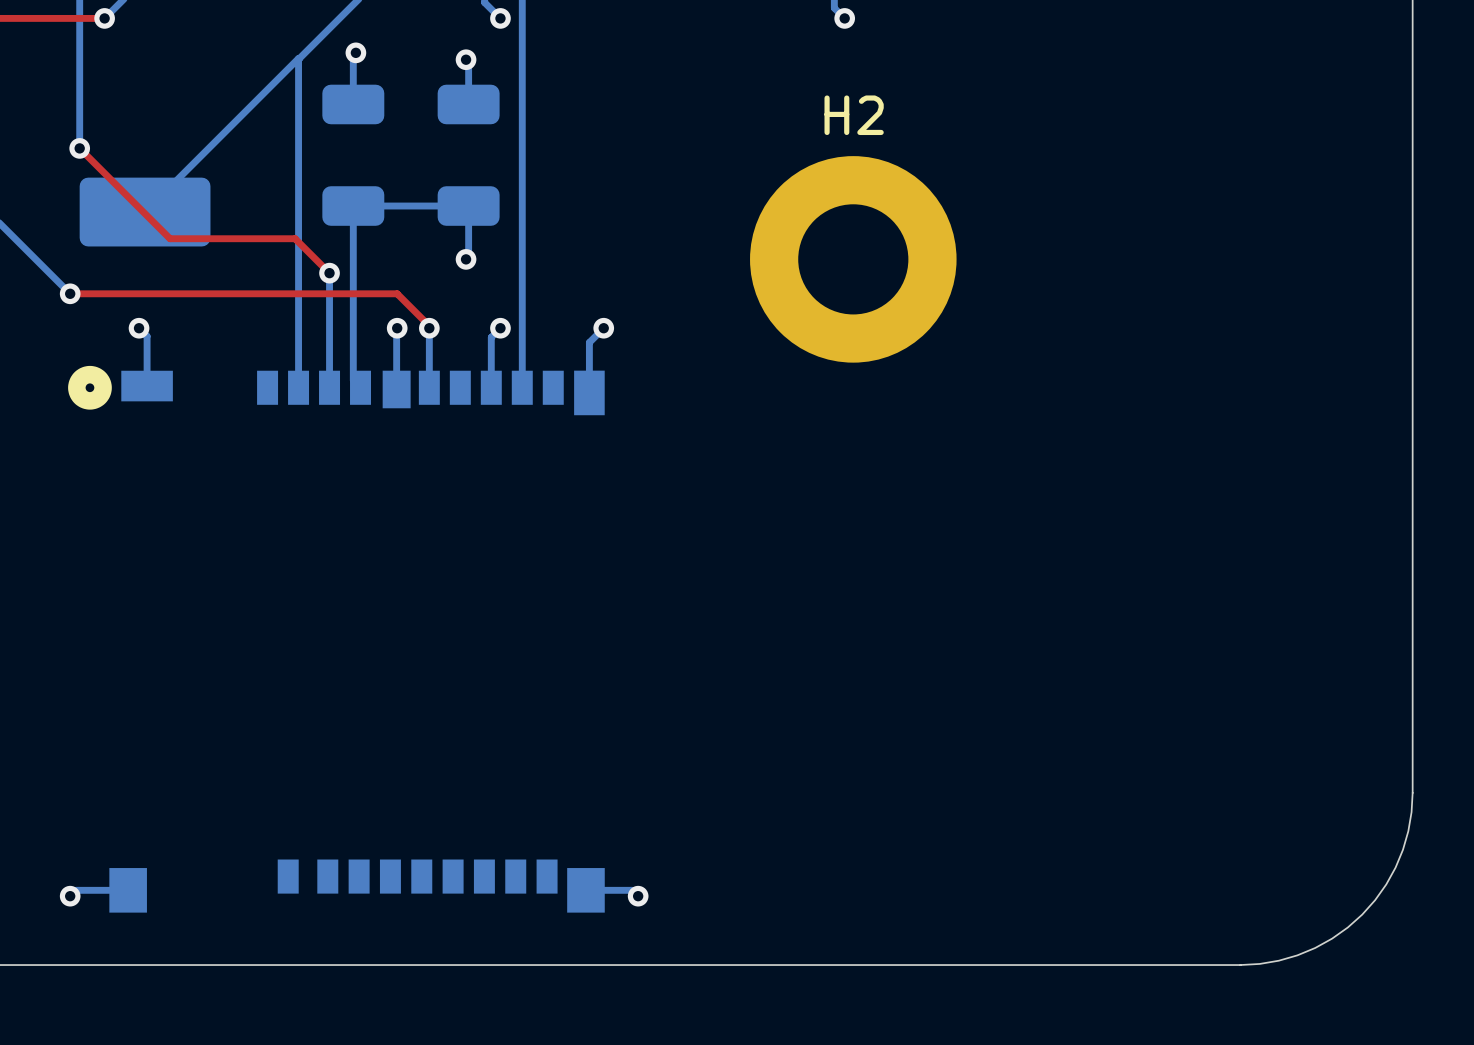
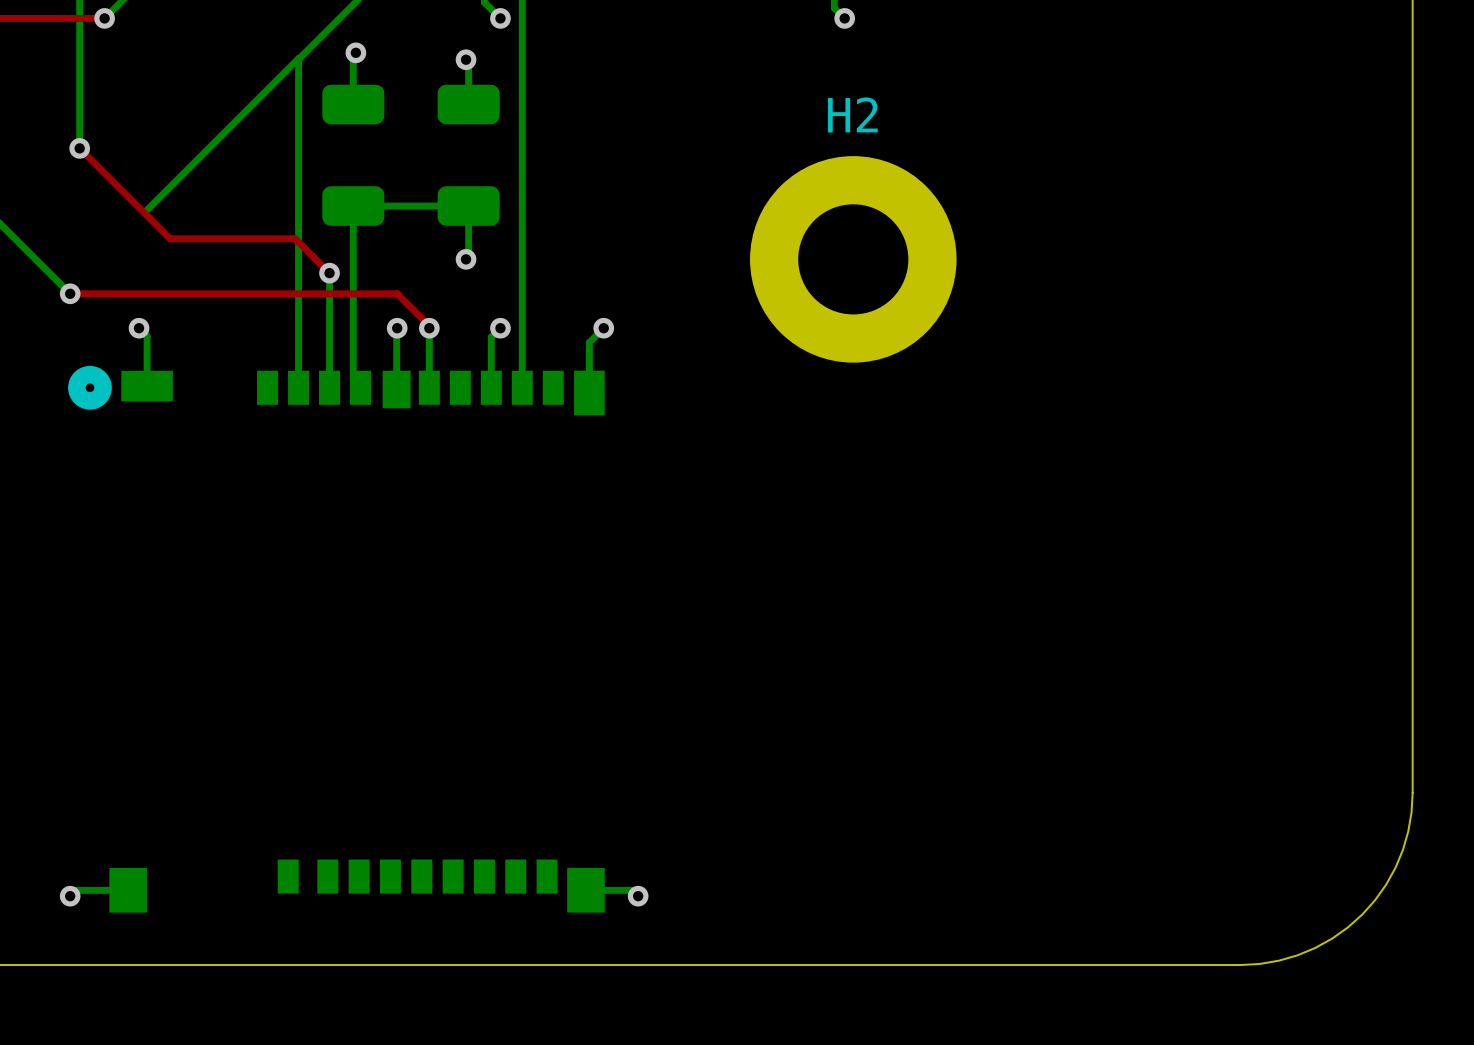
part: (145, 212) -> none

